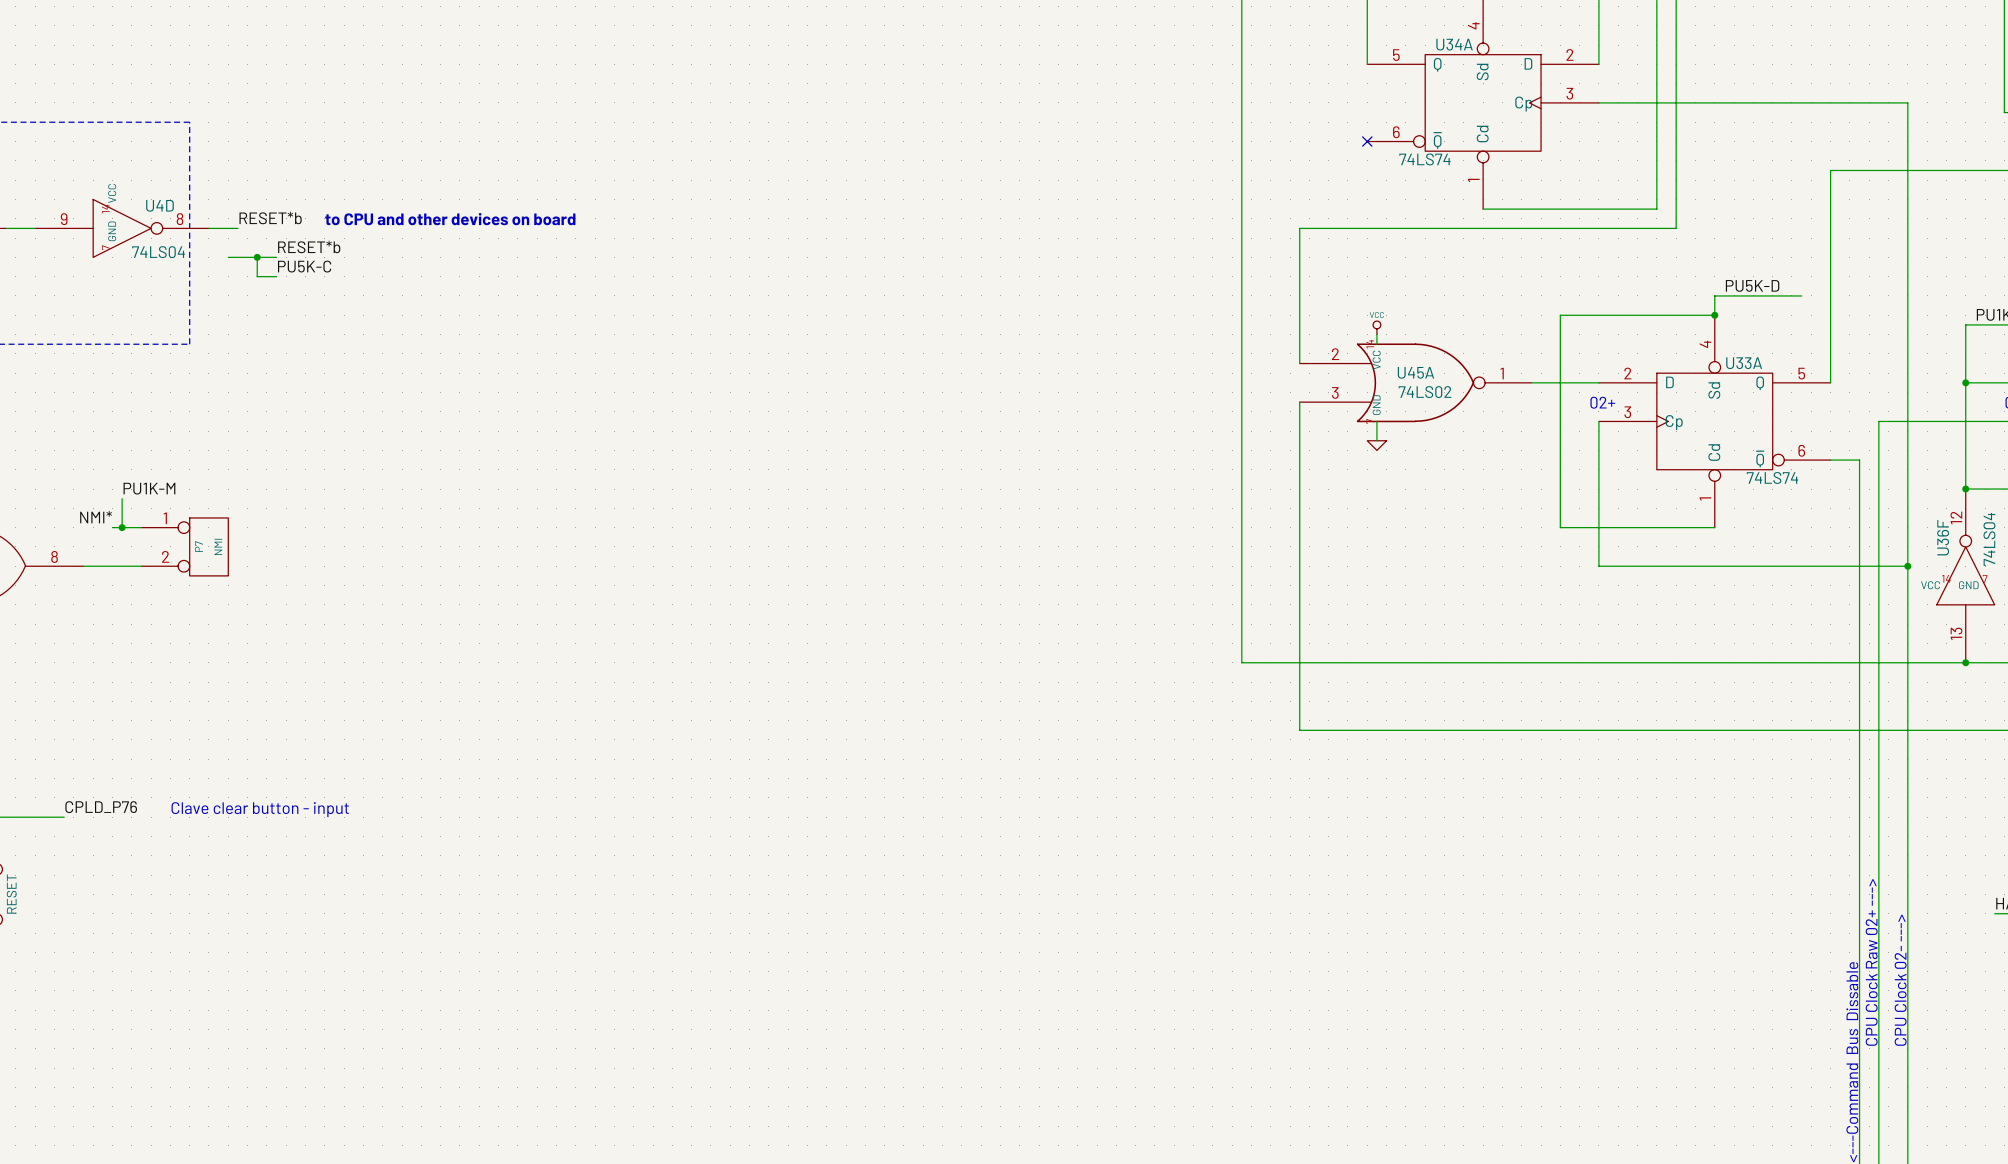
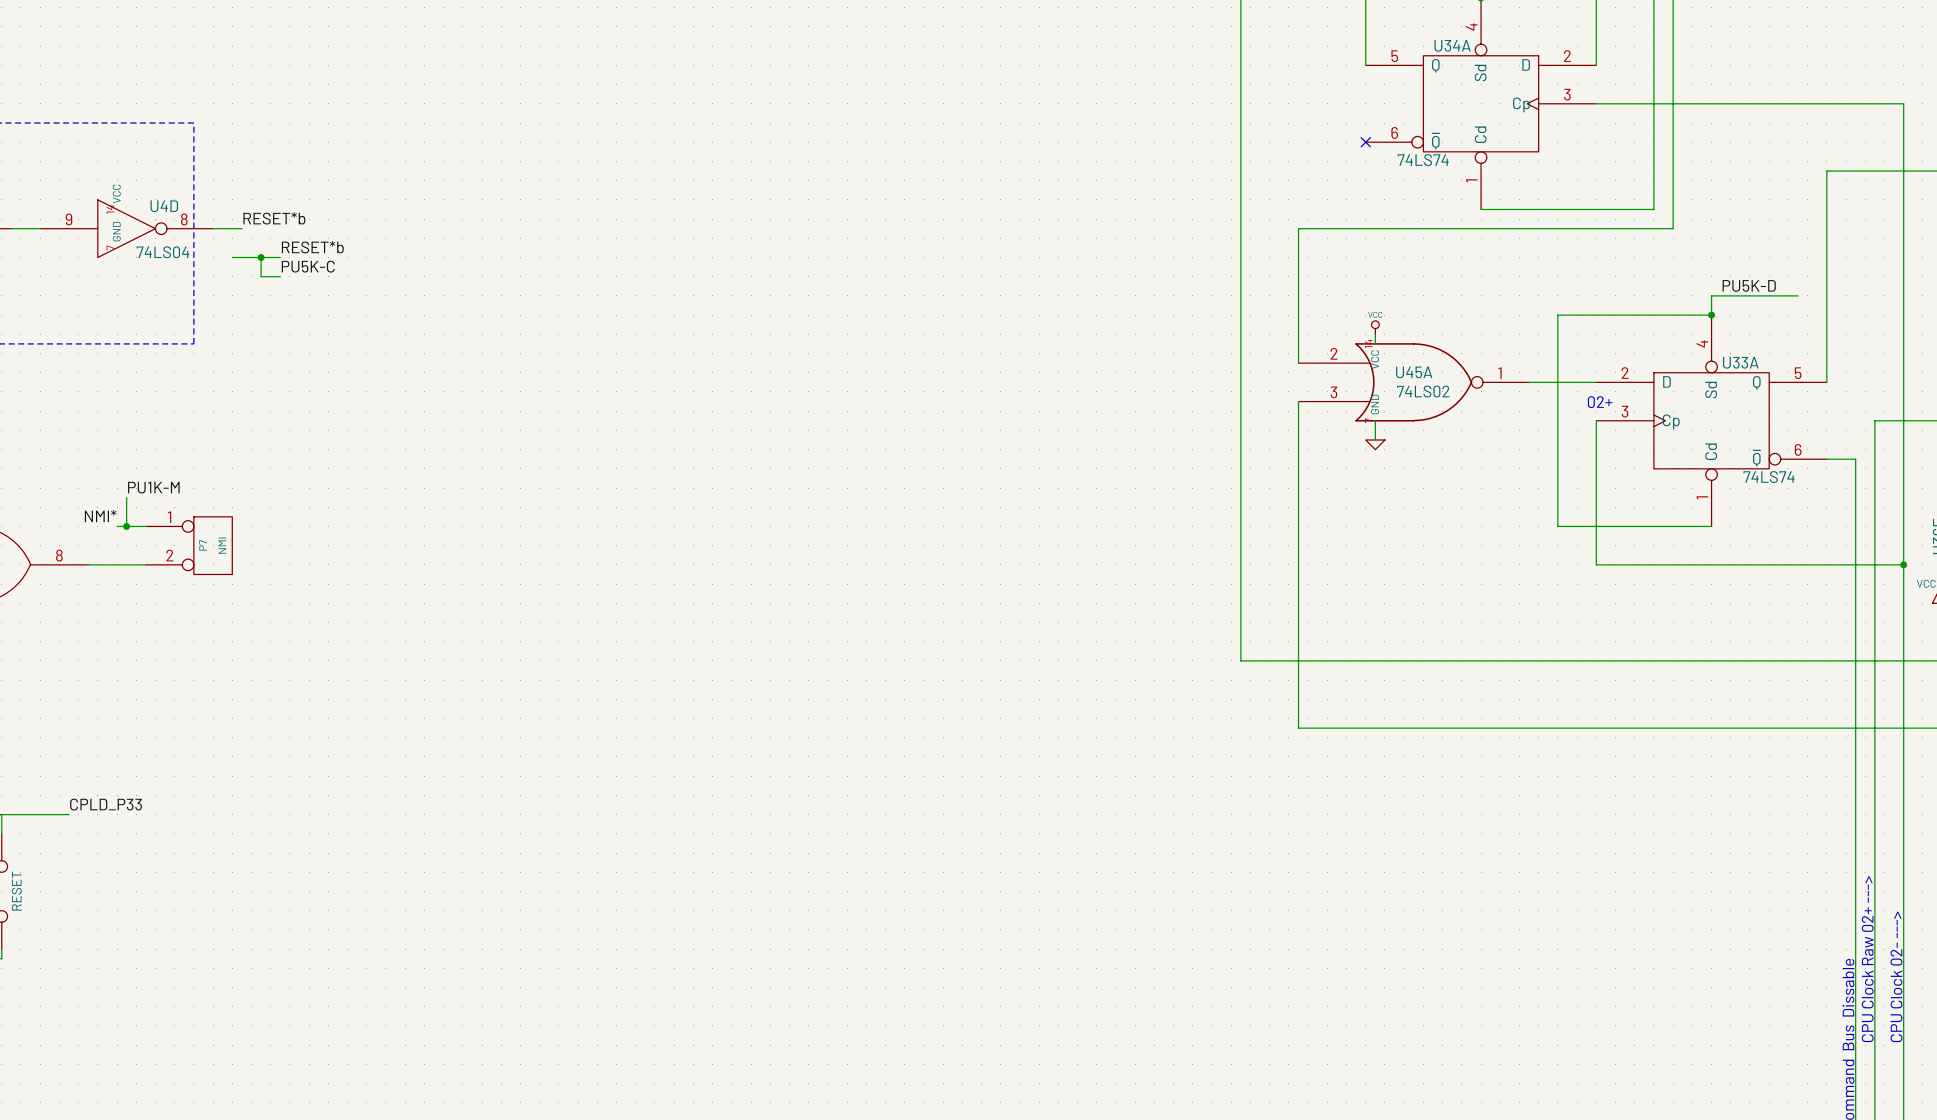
text: to CPU and other devices on board (450, 219) -> none
label: CPLD_P76 (101, 807) -> CPLD_P33 (106, 804)
text: Clave clear button - input (260, 809) -> none

